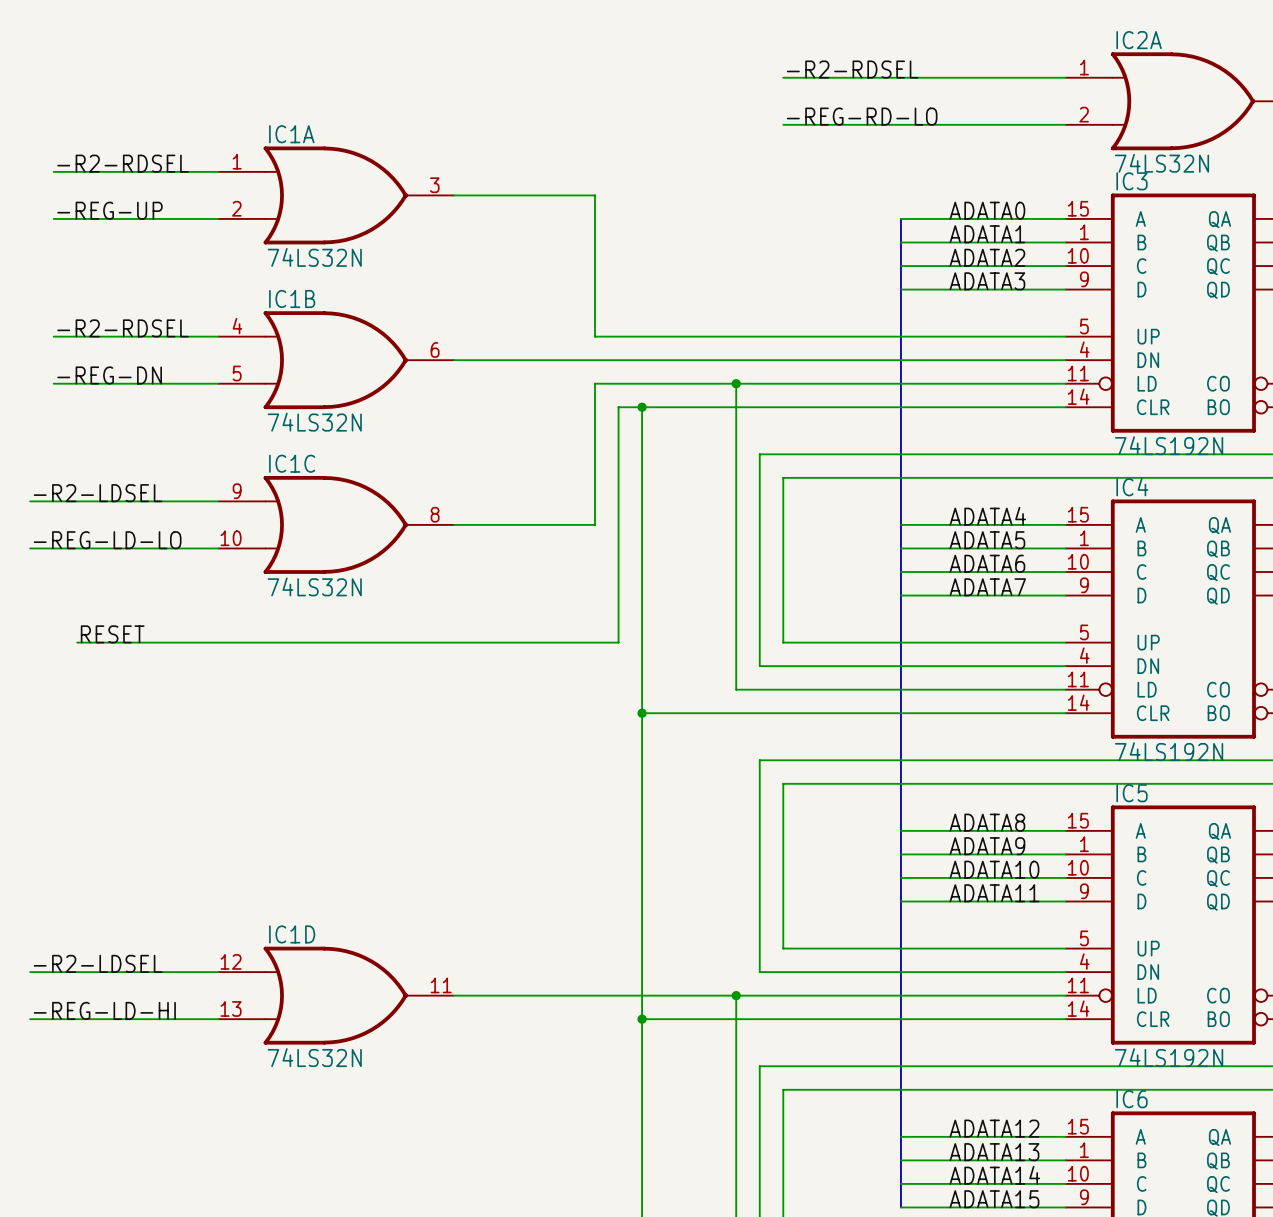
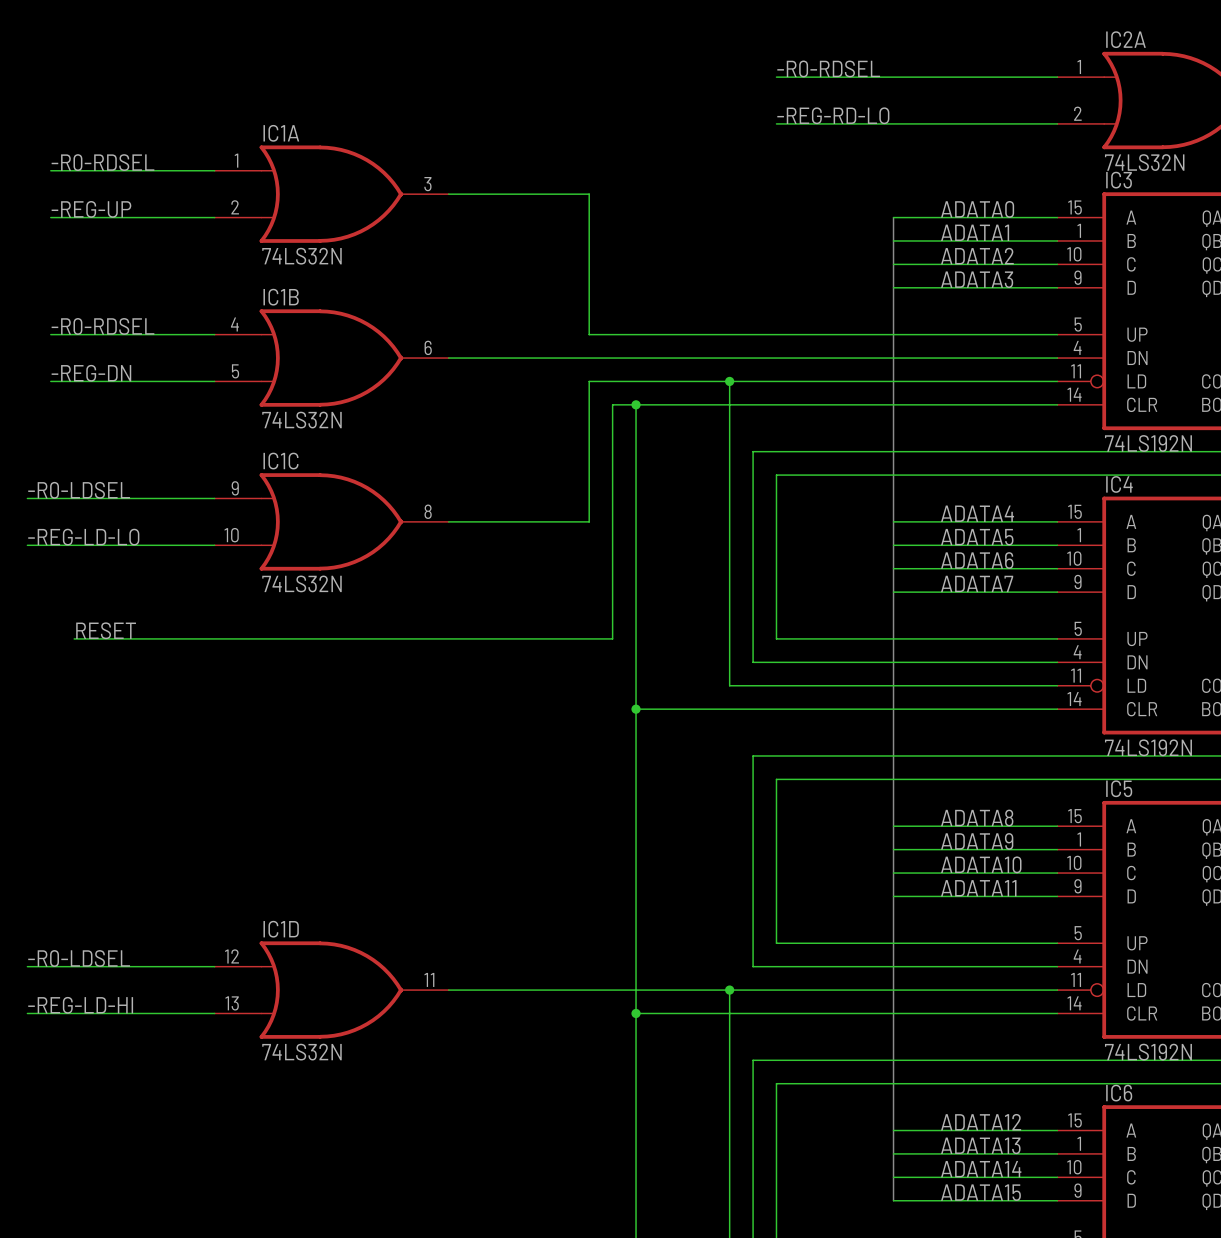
label: -R2-RDSEL (852, 69) -> -R0-RDSEL (828, 68)
label: -R2-RDSEL (123, 163) -> -R0-RDSEL (102, 162)
label: -R2-RDSEL (123, 328) -> -R0-RDSEL (102, 326)
label: -R2-LDSEL (98, 493) -> -R0-LDSEL (79, 490)
label: -R2-LDSEL (98, 963) -> -R0-LDSEL (79, 958)

